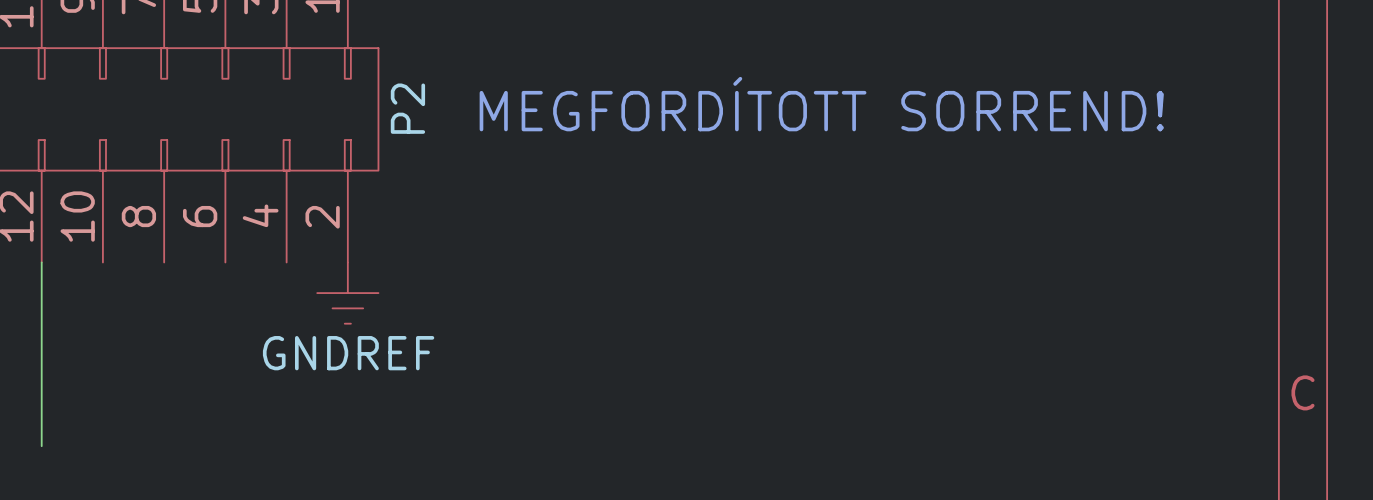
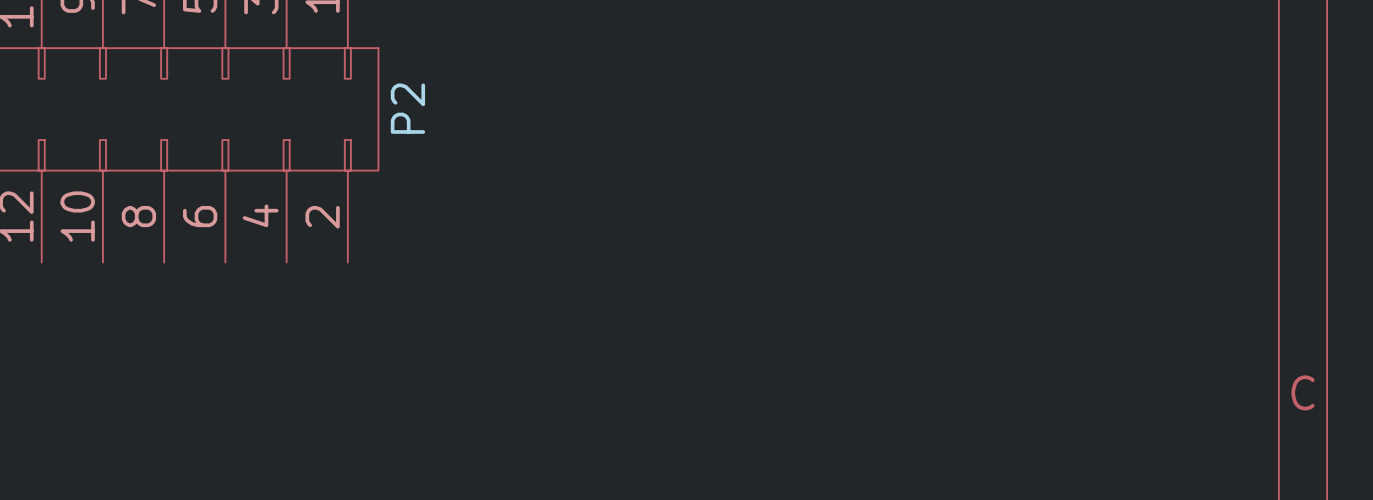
text: MEGFORDÍTOTT SORREND! (821, 104) -> none
wire: (41, 262) (41, 446) -> none
power symbol: GNDREF (347, 293) -> none

